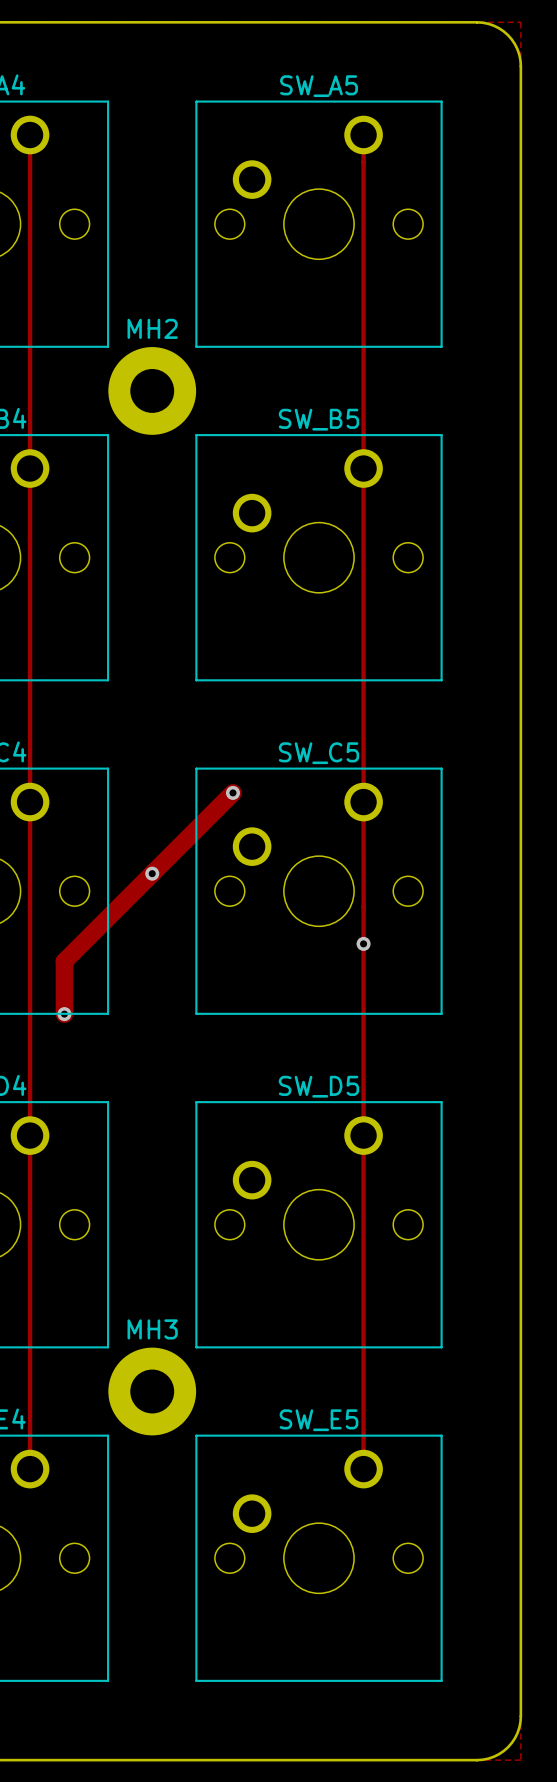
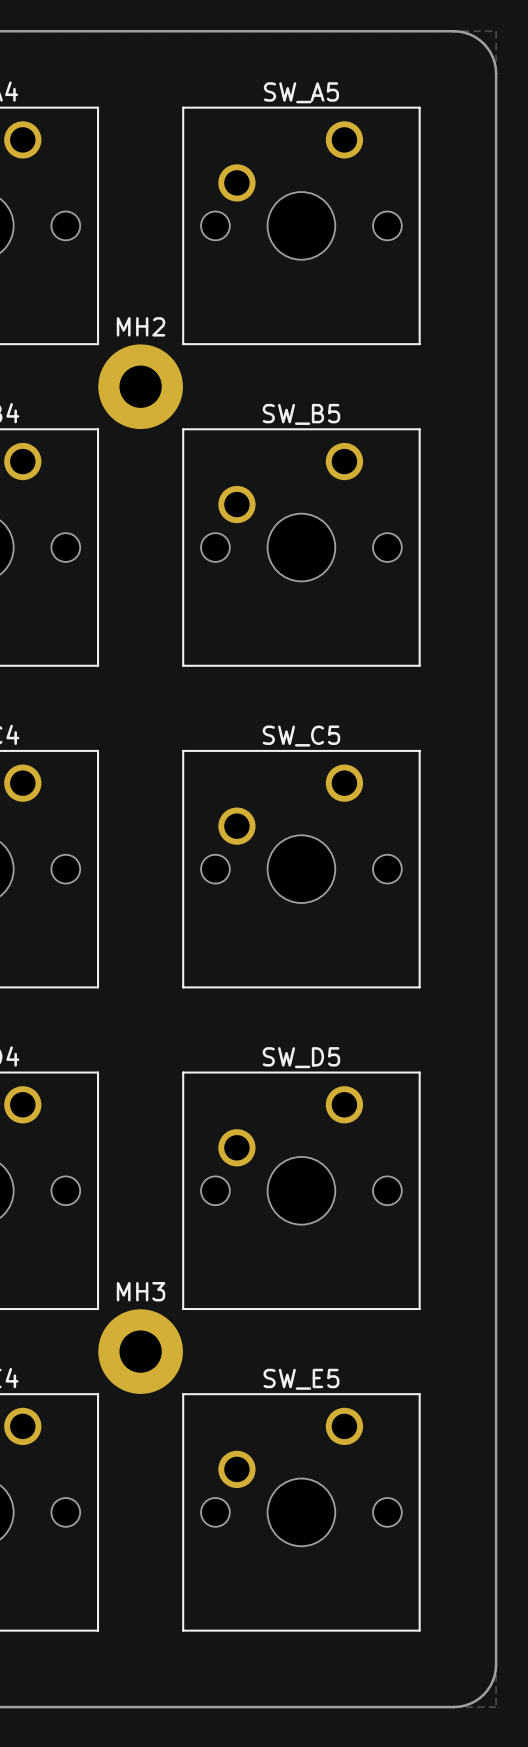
track: (30, 135) (30, 1469) -> none
track: (363, 135) (363, 1469) -> none
track: (232, 792) (64, 961) (64, 1014) -> none
via: (232, 792) -> none
via: (152, 873) -> none
via: (363, 943) -> none
via: (64, 1014) -> none

